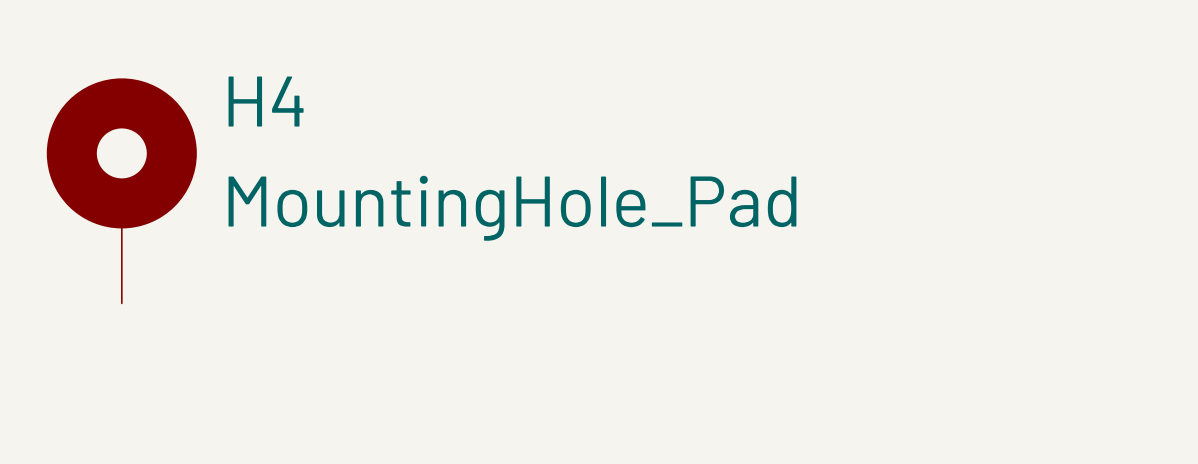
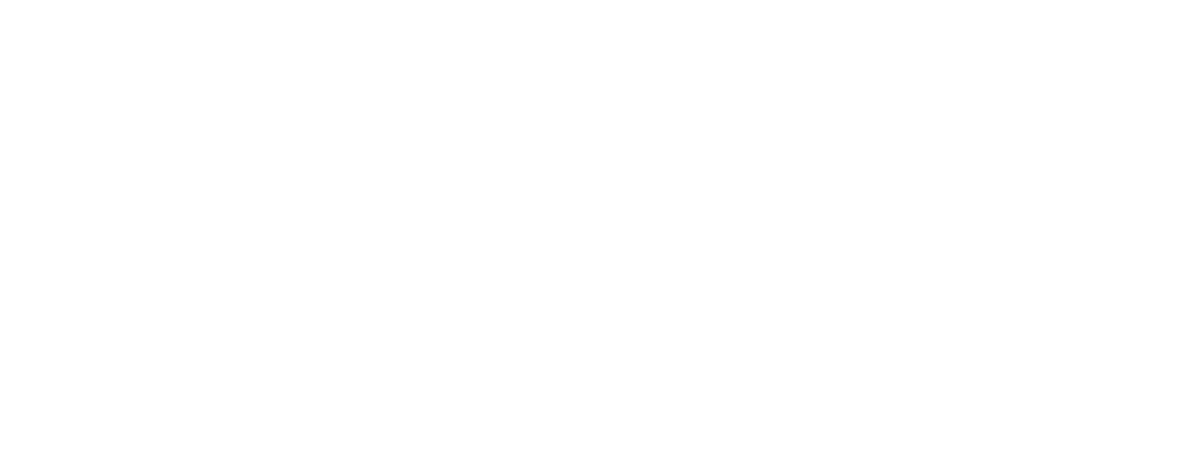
H4: MountingHole_Pad (121, 190) -> none

